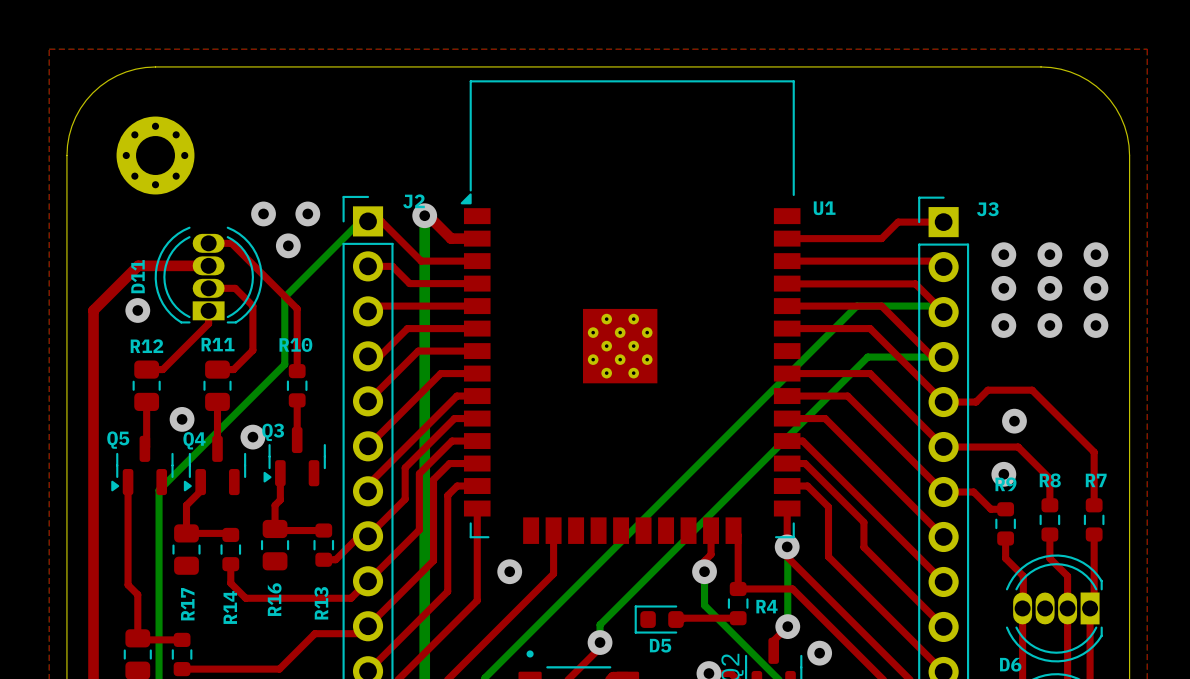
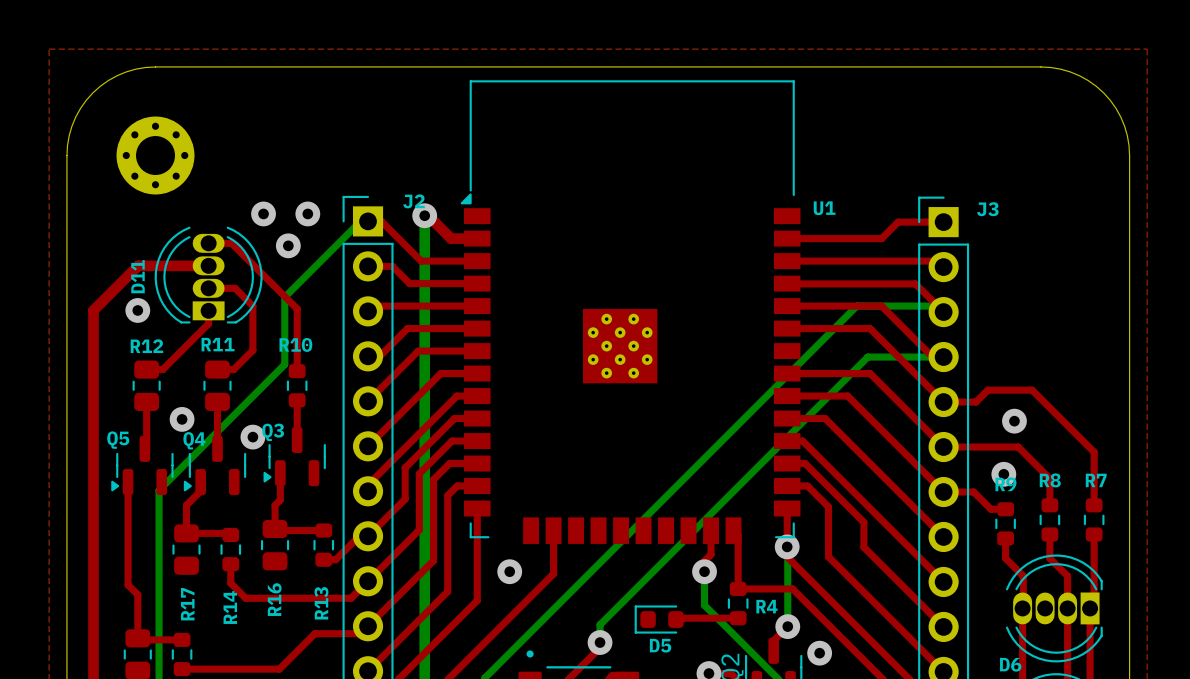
via: (1003, 254) -> none
via: (1049, 254) -> none
via: (1095, 254) -> none
via: (1003, 288) -> none
via: (1049, 288) -> none
via: (1095, 288) -> none
via: (1003, 325) -> none
via: (1049, 325) -> none
via: (1095, 325) -> none

